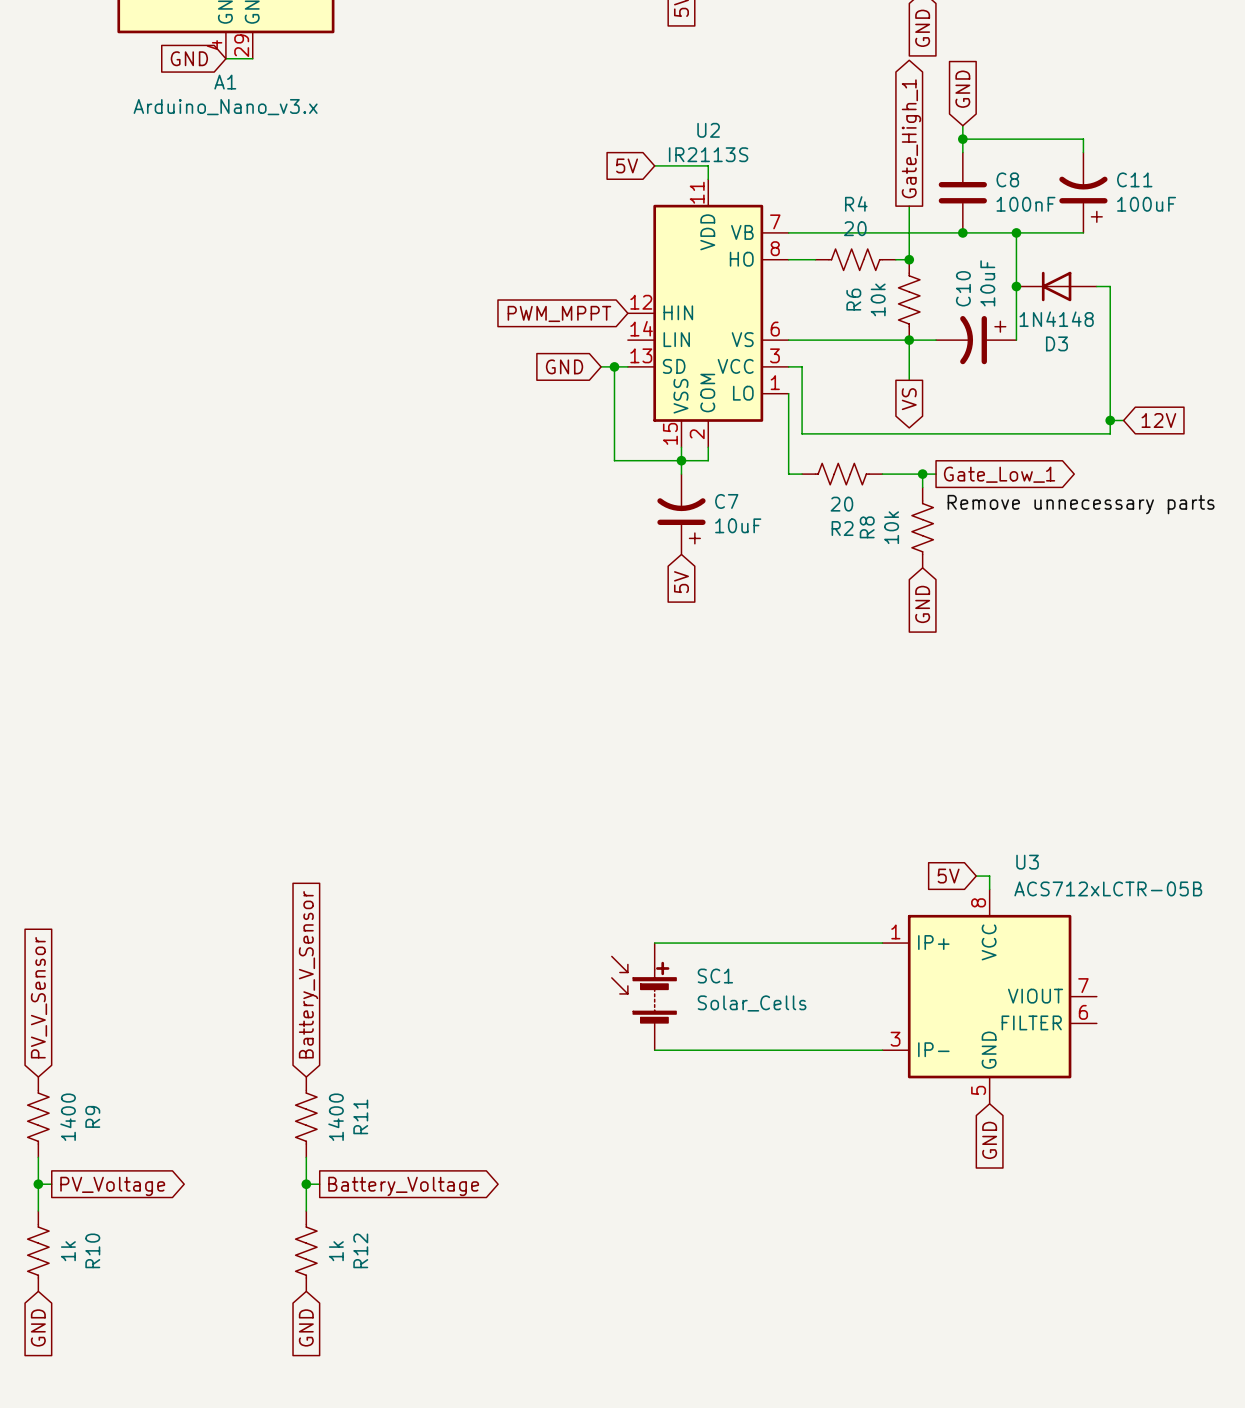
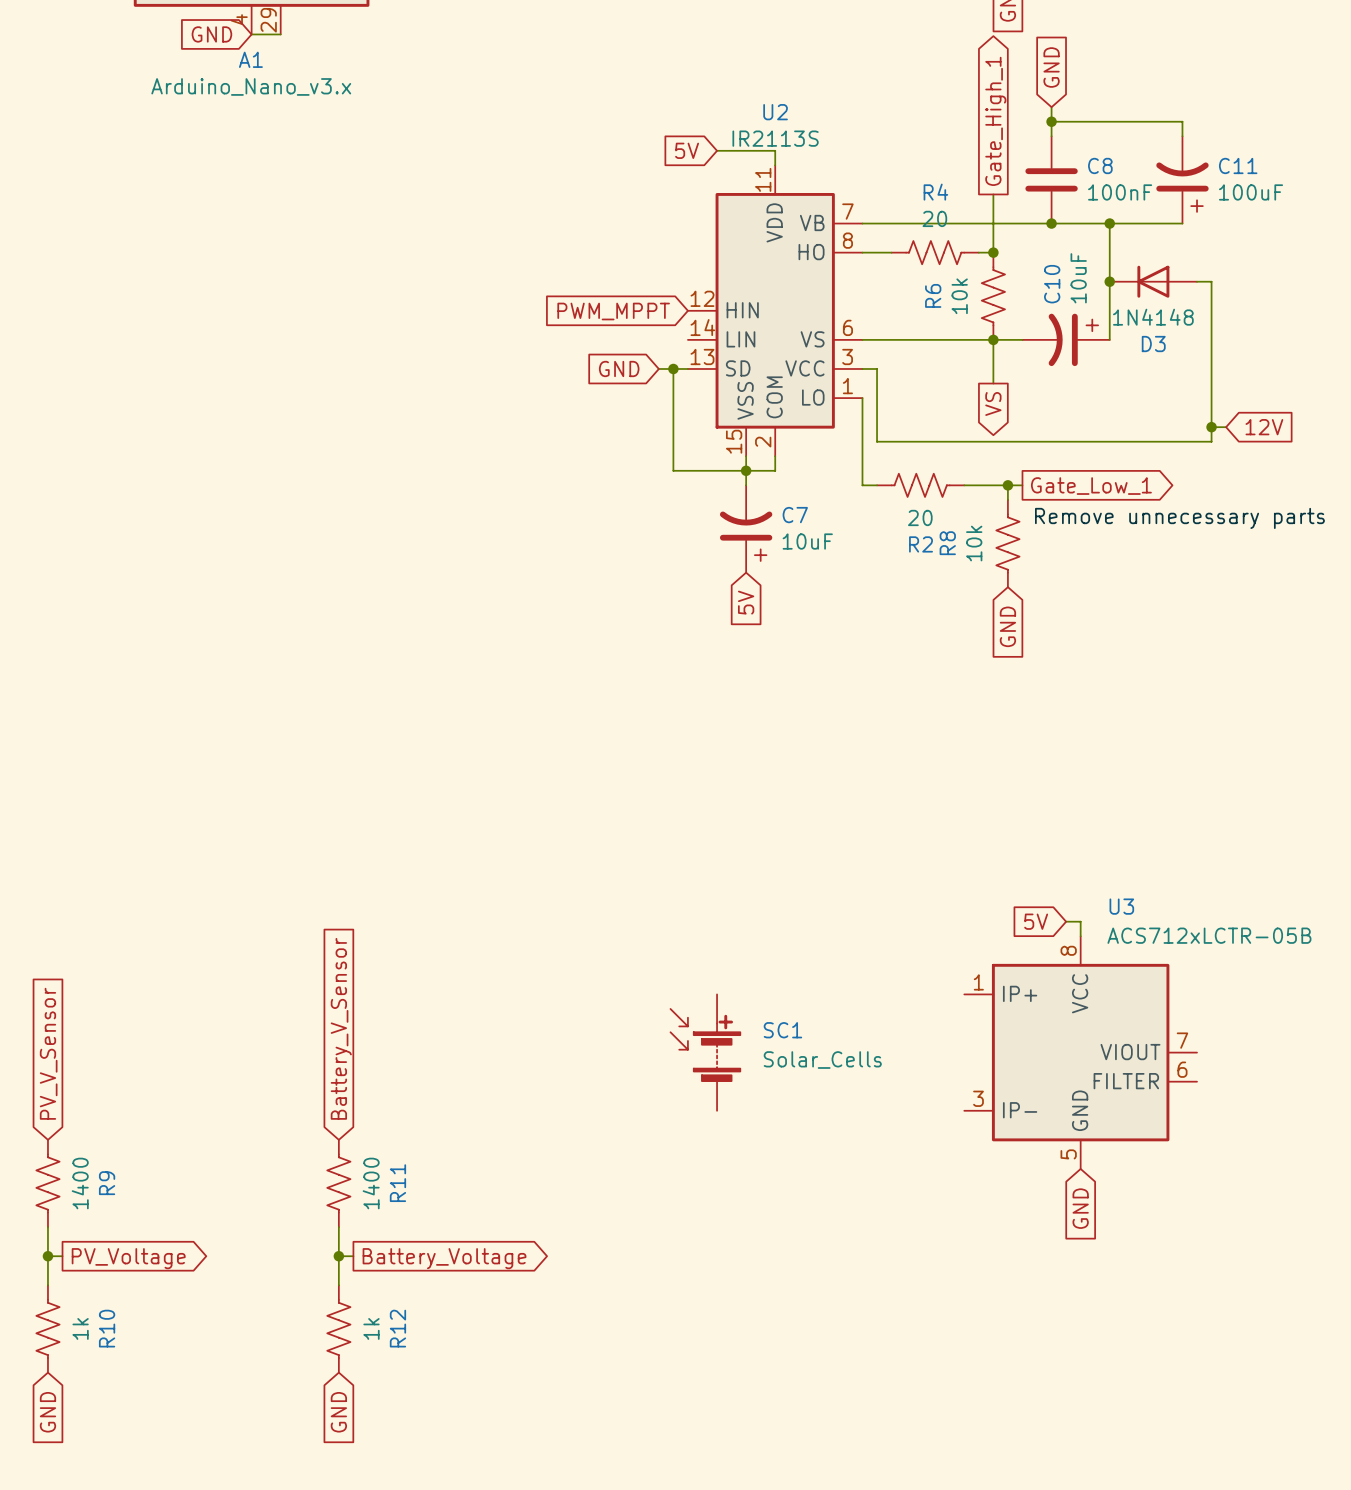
wire: (654, 943) (882, 943) -> none
wire: (654, 1050) (882, 1050) -> none

